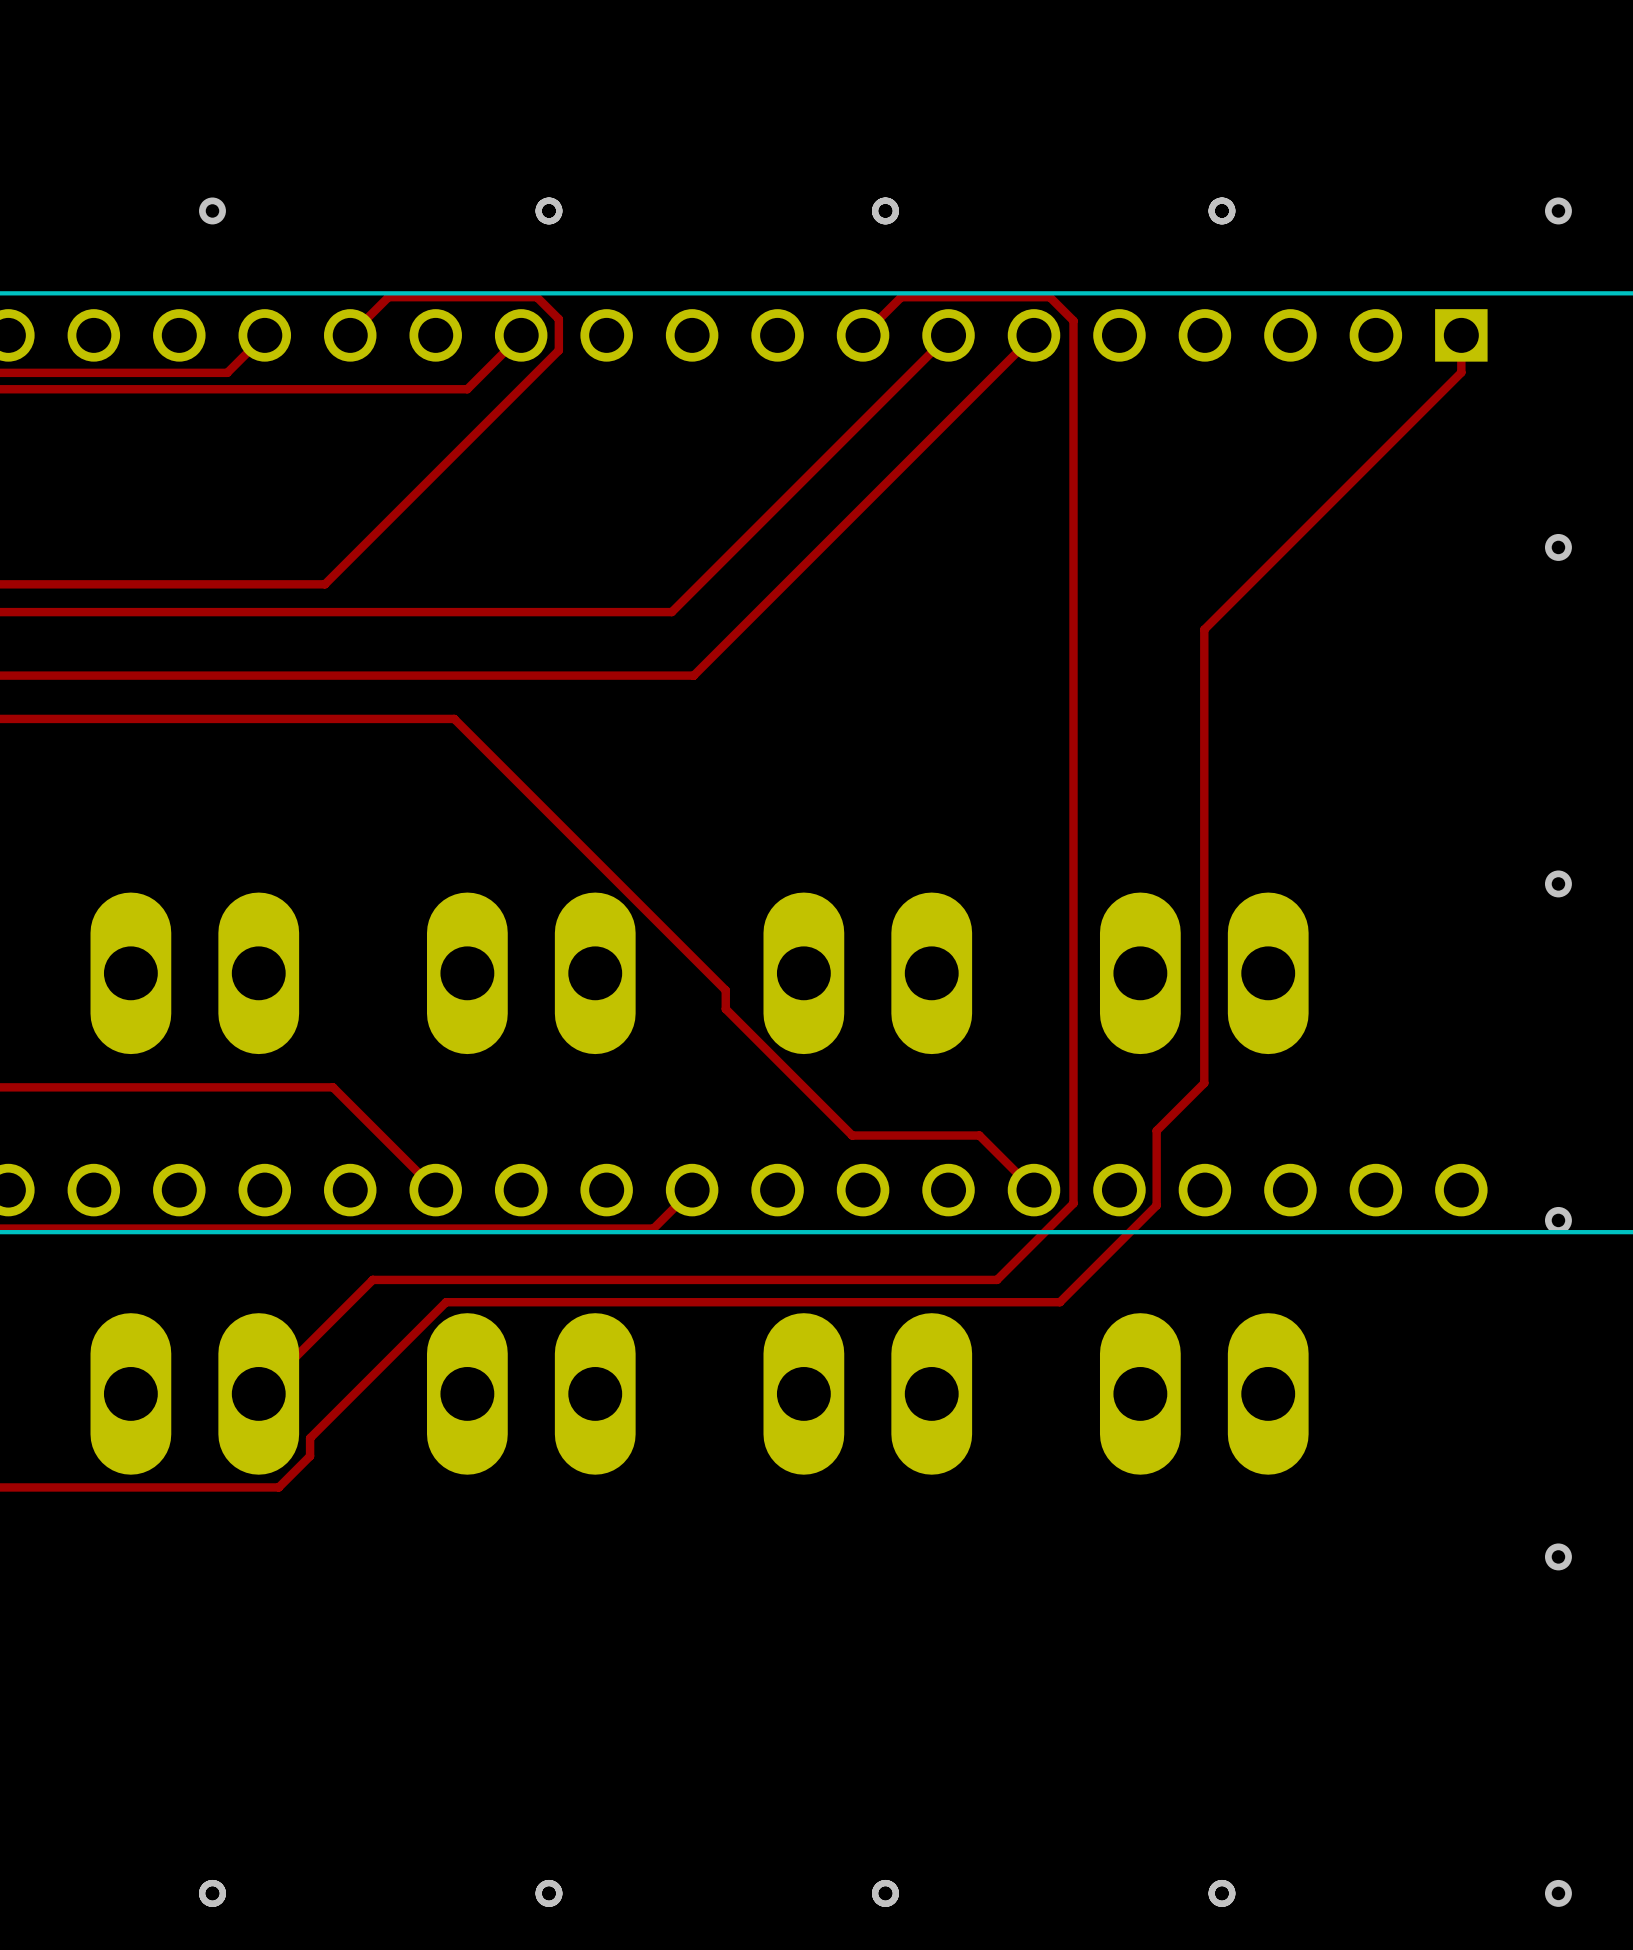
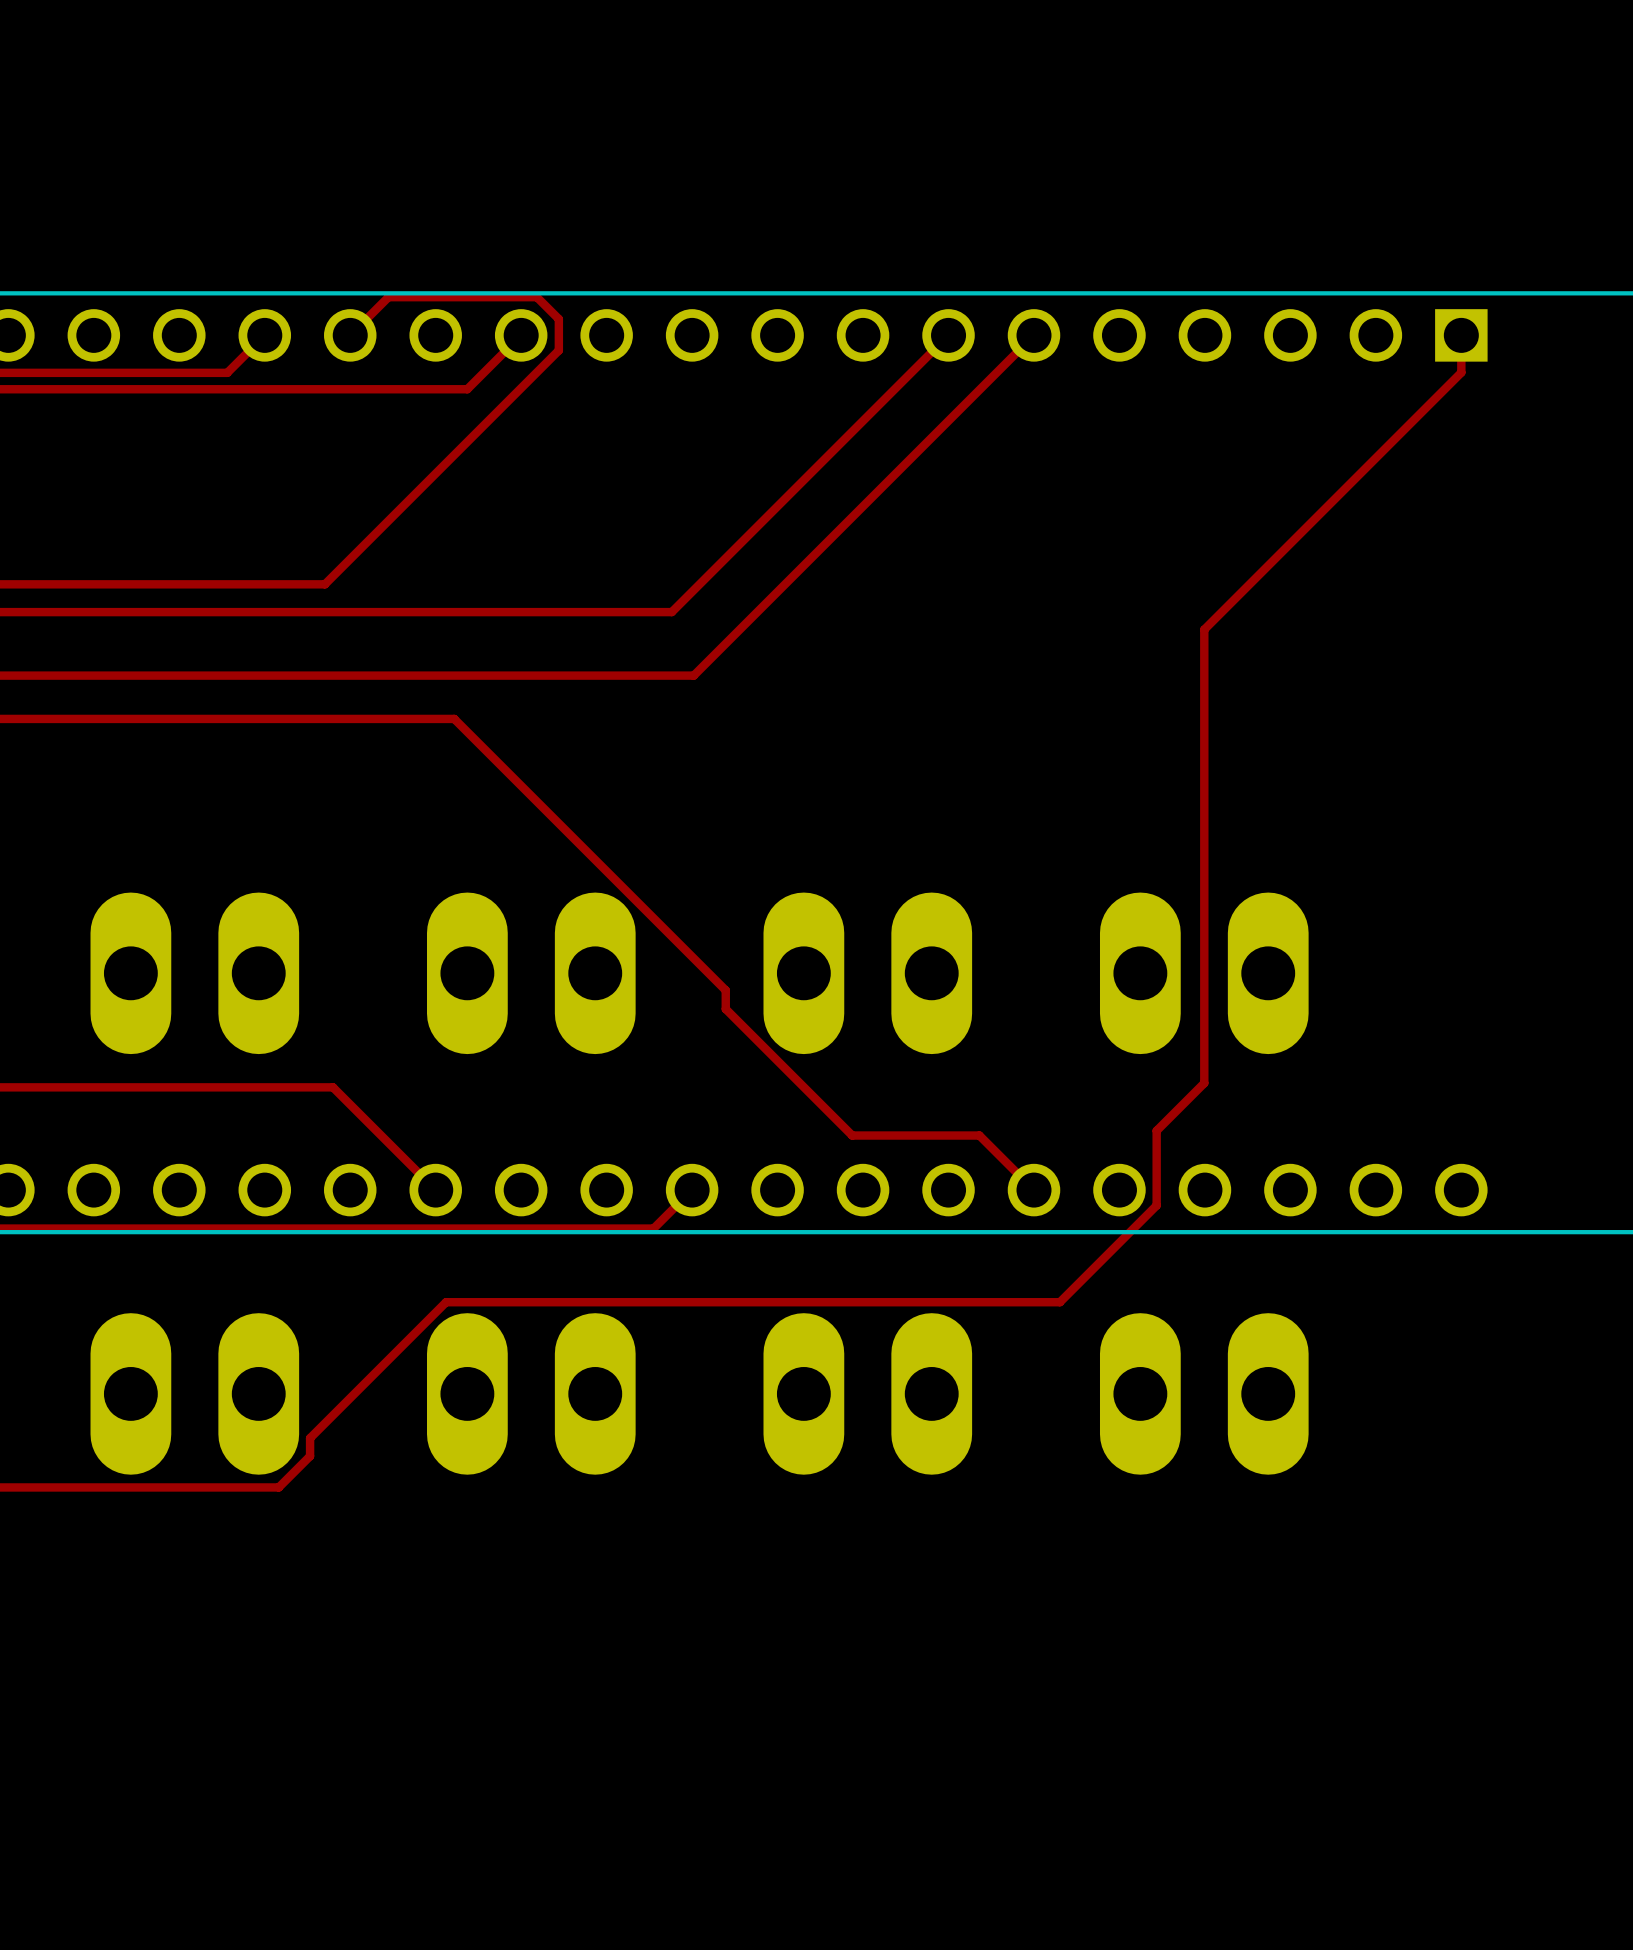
via: (212, 210) -> none
via: (548, 210) -> none
via: (885, 210) -> none
via: (1221, 210) -> none
via: (1558, 210) -> none
track: (863, 335) (901, 297) (1049, 297) (1073, 320) (1073, 1203) (997, 1279) (372, 1279) (258, 1393) -> none
via: (1558, 547) -> none
via: (1558, 883) -> none
via: (1558, 1220) -> none
via: (1558, 1556) -> none
via: (212, 1893) -> none
via: (548, 1893) -> none
via: (885, 1893) -> none
via: (1221, 1893) -> none
via: (1558, 1893) -> none

